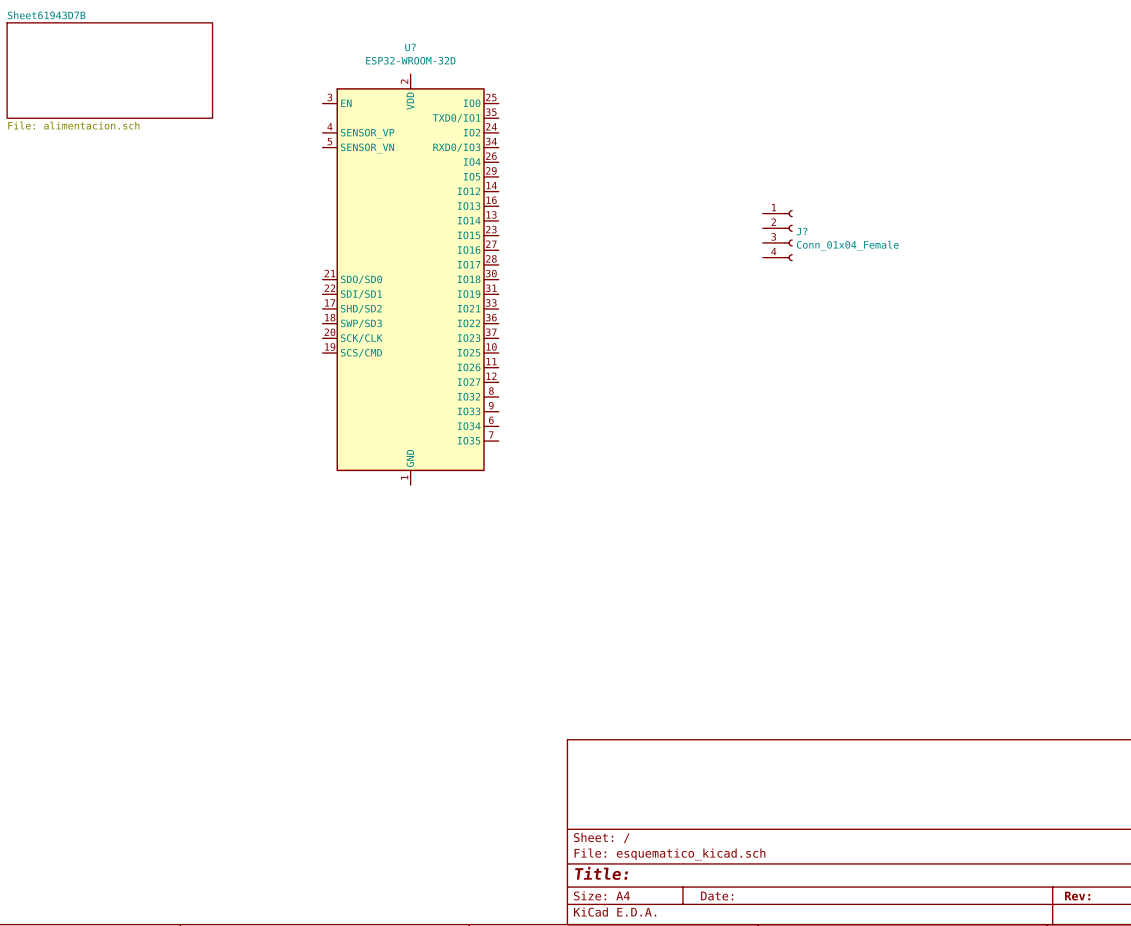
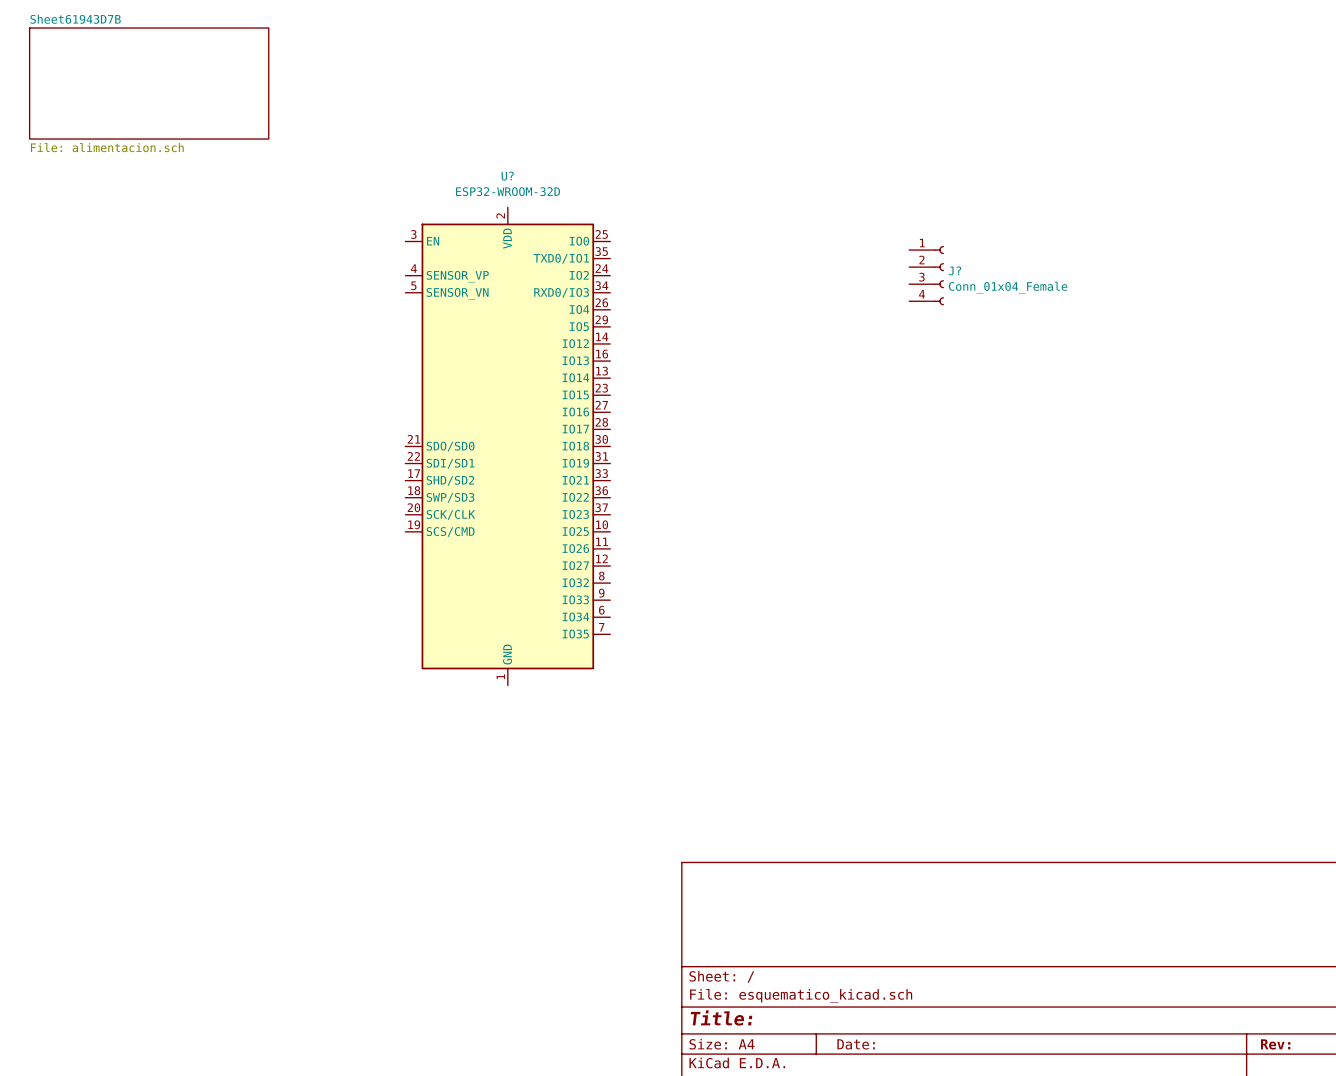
U? position: (410, 279) -> (507, 446)

